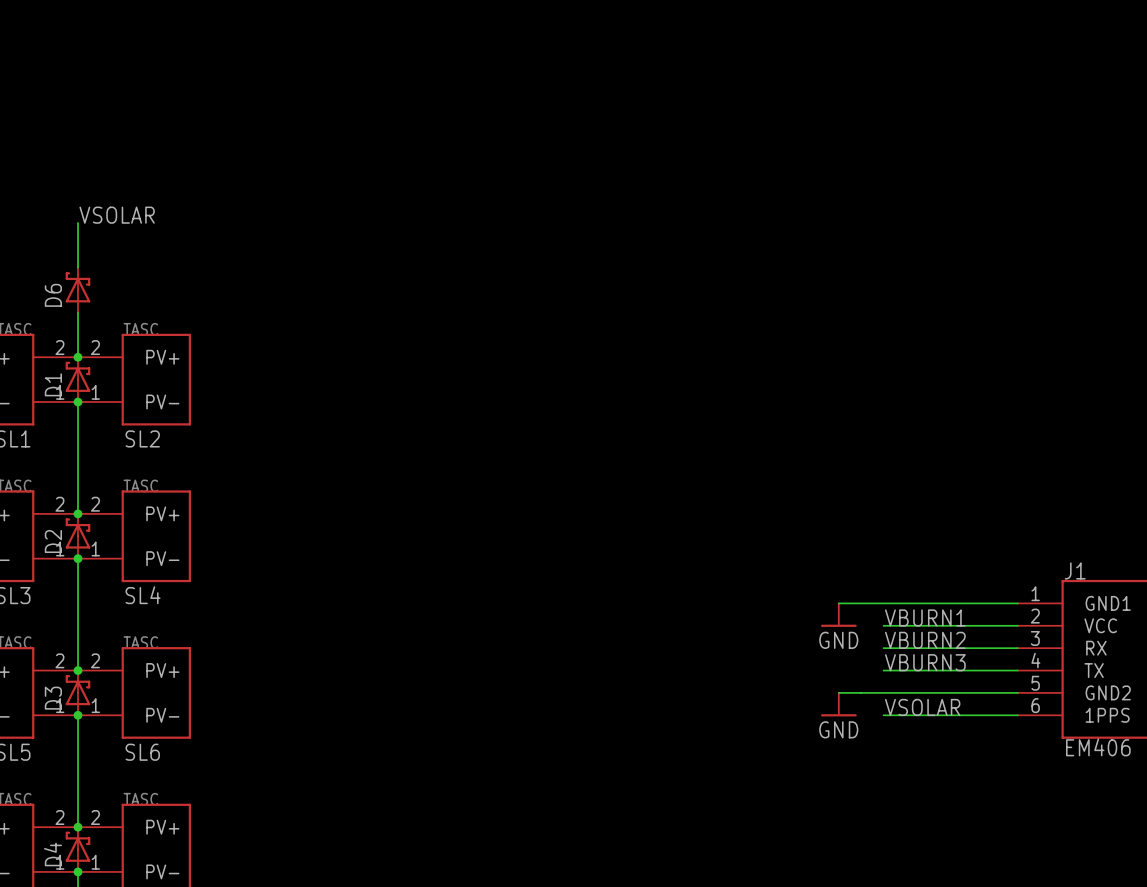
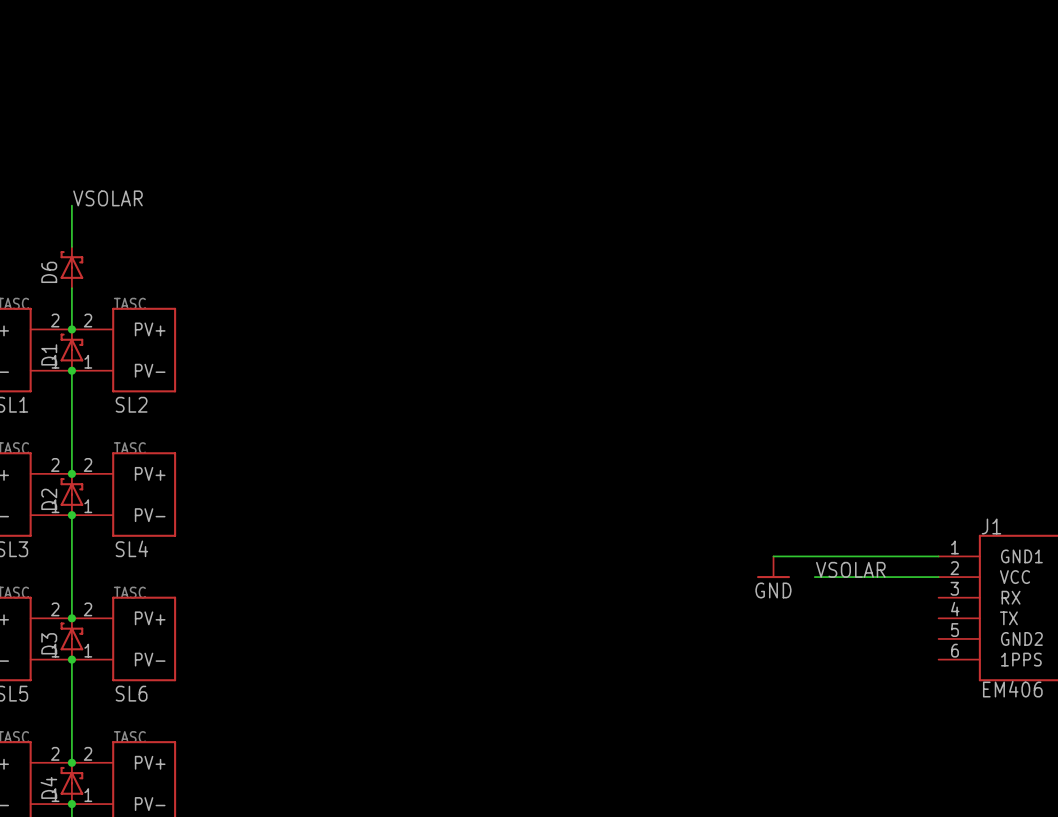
label: VBURN1 (925, 617) -> VSOLAR (850, 569)
label: VBURN2 (925, 640) -> none
wire: (883, 648) (1017, 648) -> none
label: VBURN3 (925, 662) -> none
wire: (883, 670) (1017, 670) -> none
wire: (838, 692) (1017, 692) -> none
power symbol: GND (838, 704) -> none
label: VSOLAR (922, 707) -> none
wire: (883, 715) (1017, 715) -> none

